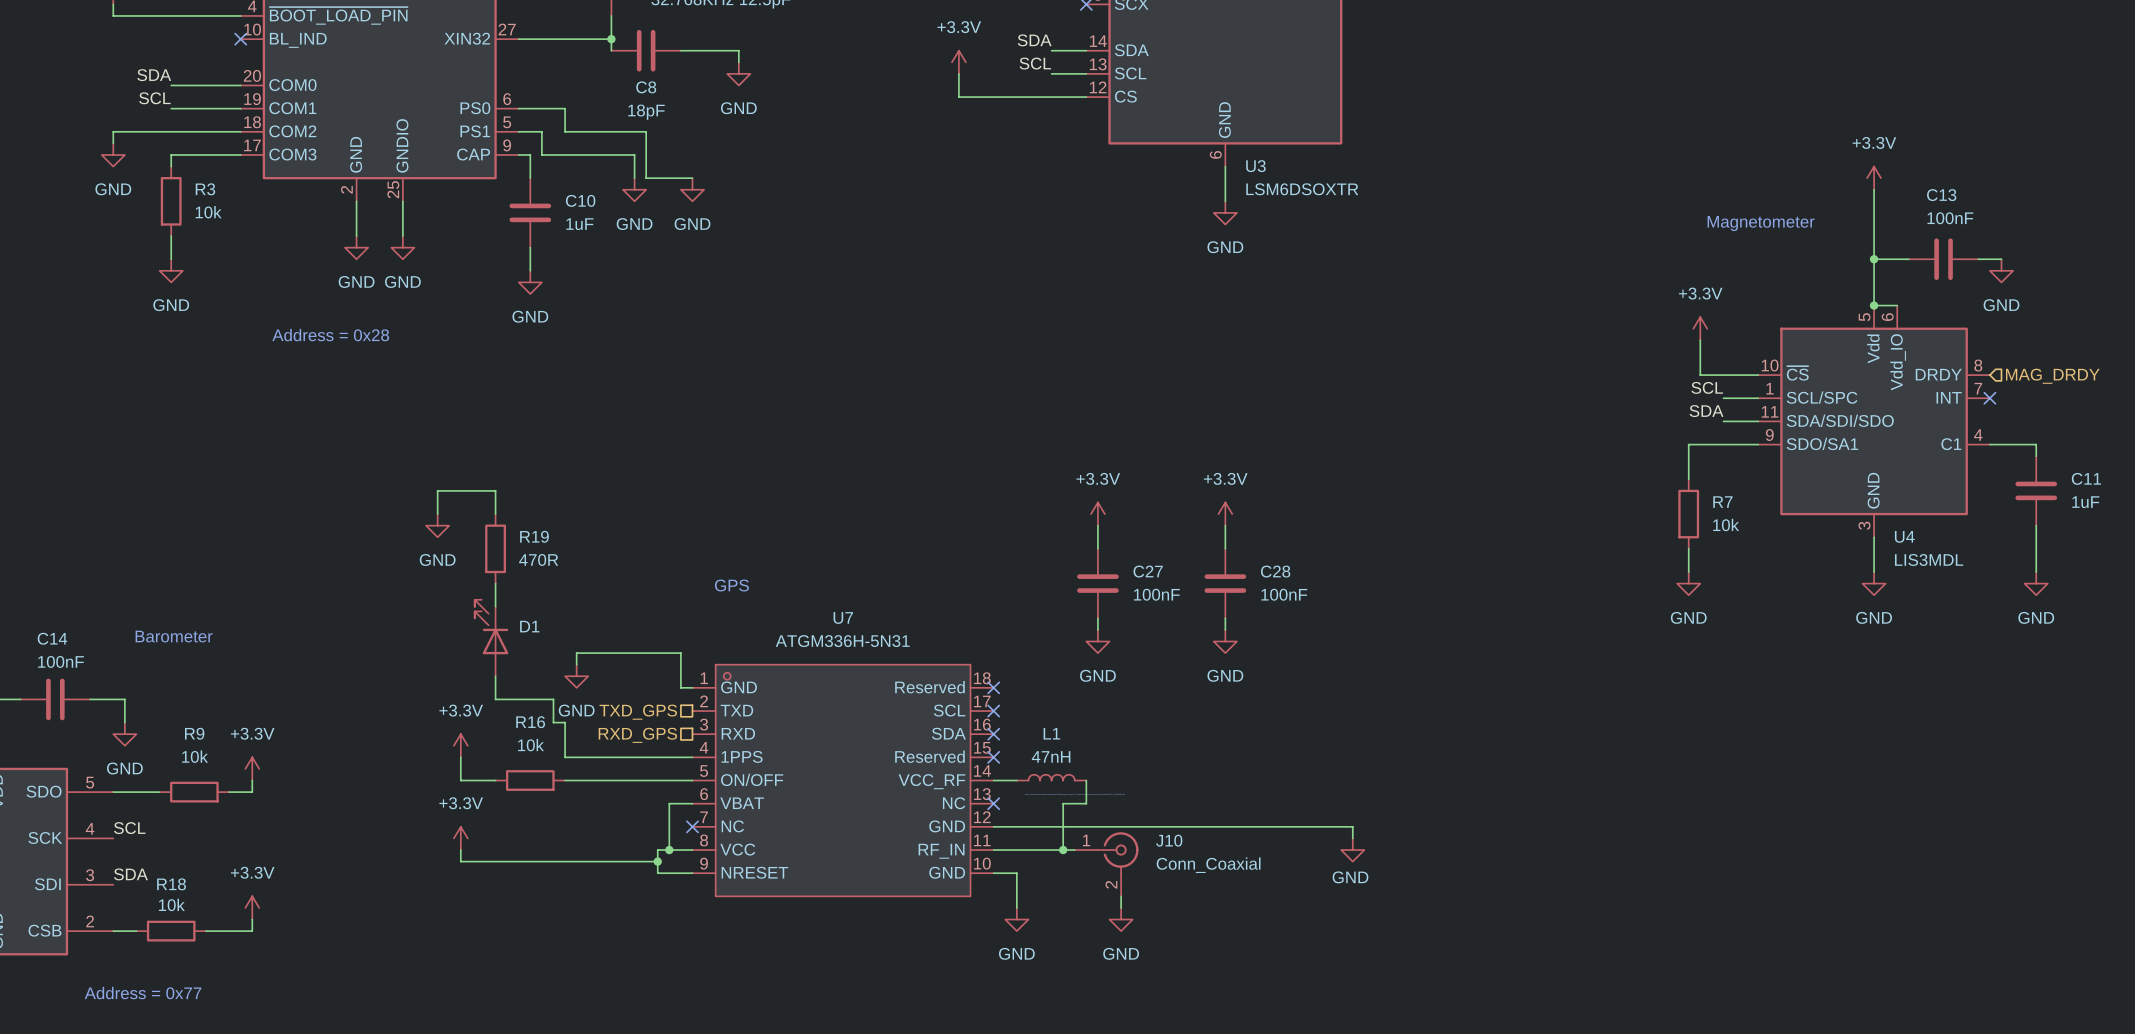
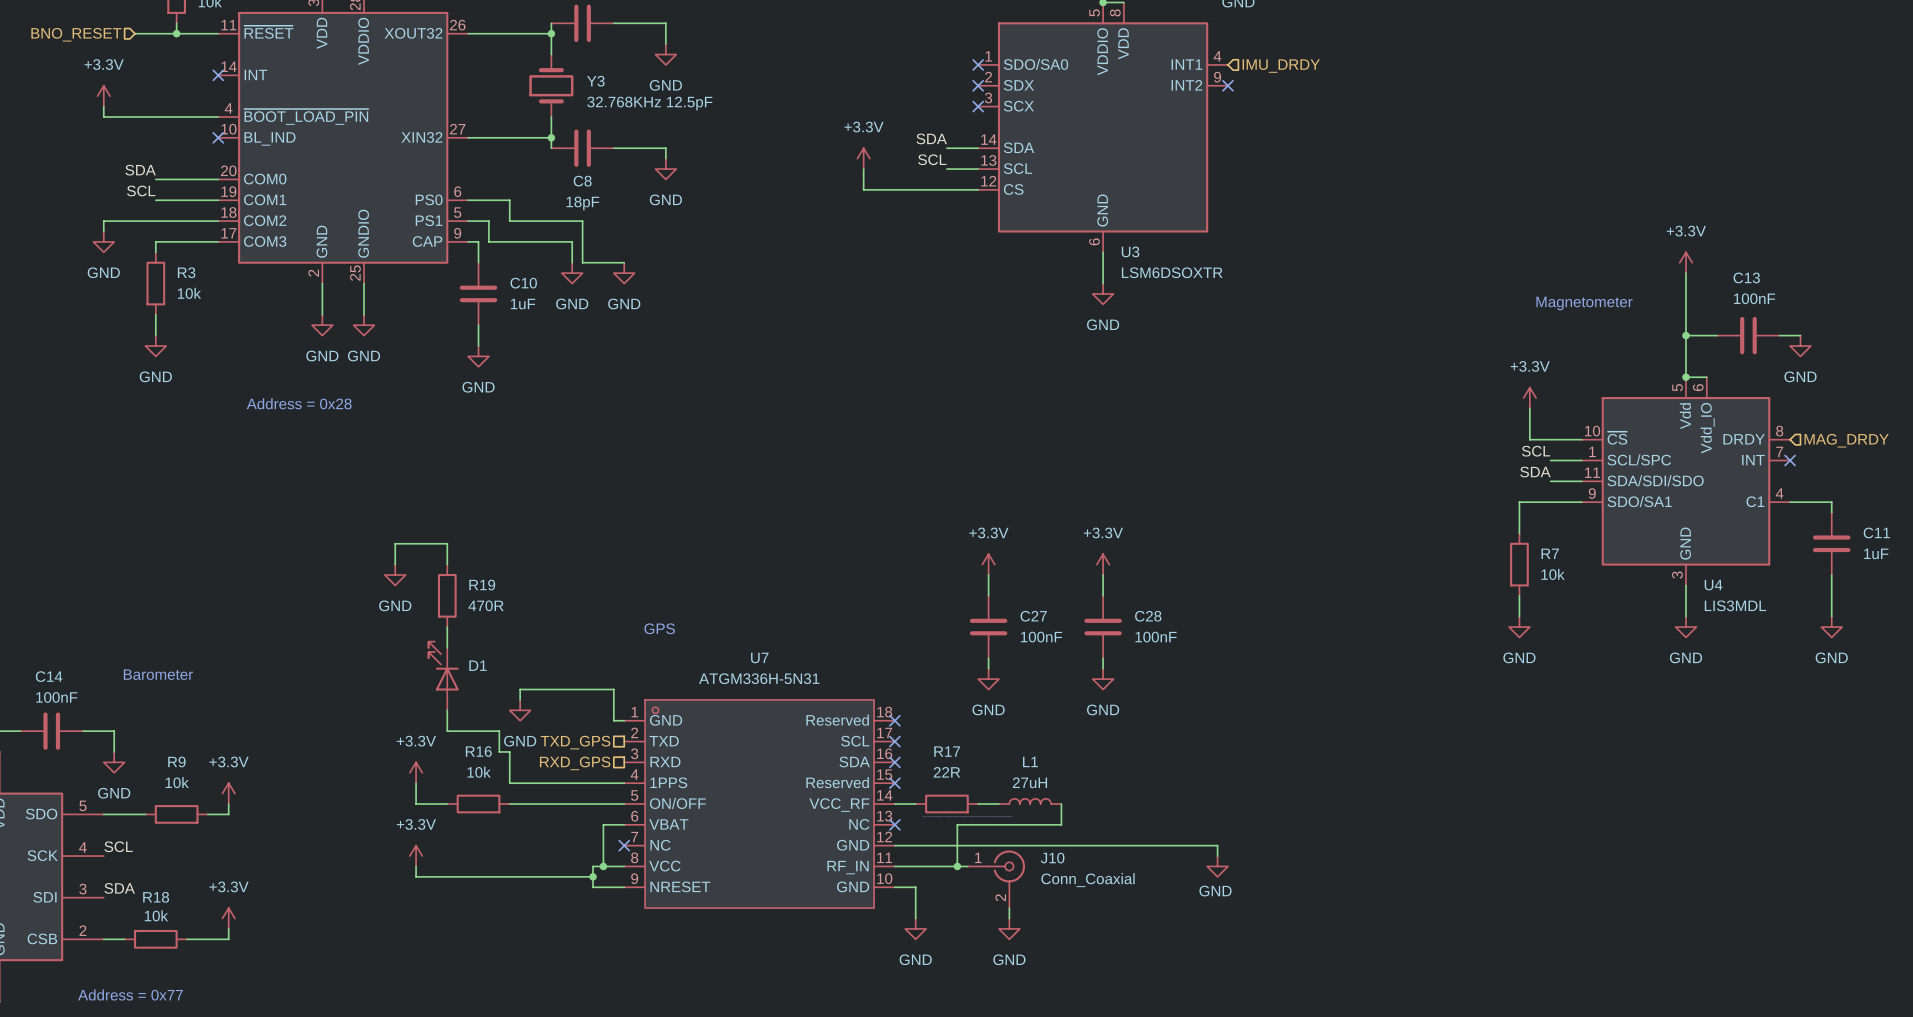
L1 value: 47nH (1051, 756) -> 27uH (1029, 782)
L1 position: (1051, 777) -> (1030, 801)
R17: none -> 22R (946, 804)
wire: (1086, 780) (1086, 803) -> (978, 804) (998, 804)
wire: none -> (1061, 804) (1061, 824) (978, 824)

